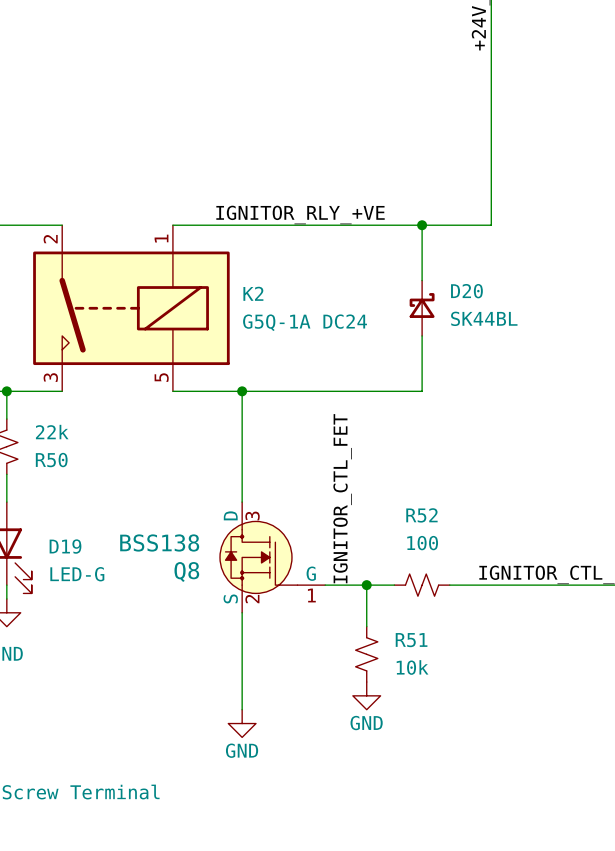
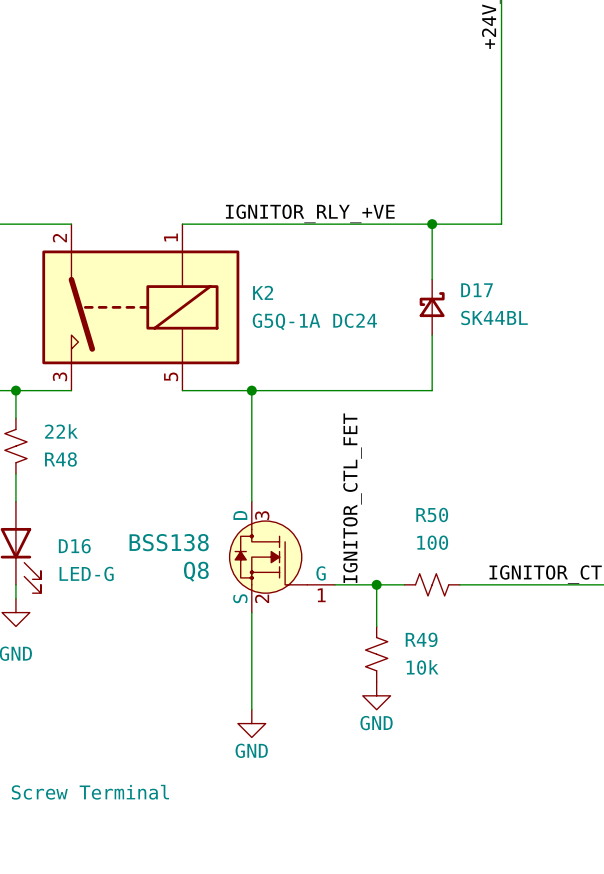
D20 name: D20 (466, 291) -> D17 (477, 290)
R50 name: R50 (51, 460) -> R48 (60, 459)
R52 name: R52 (421, 515) -> R50 (432, 514)
D19 name: D19 (65, 546) -> D16 (74, 546)
R51 name: R51 (411, 640) -> R49 (421, 639)

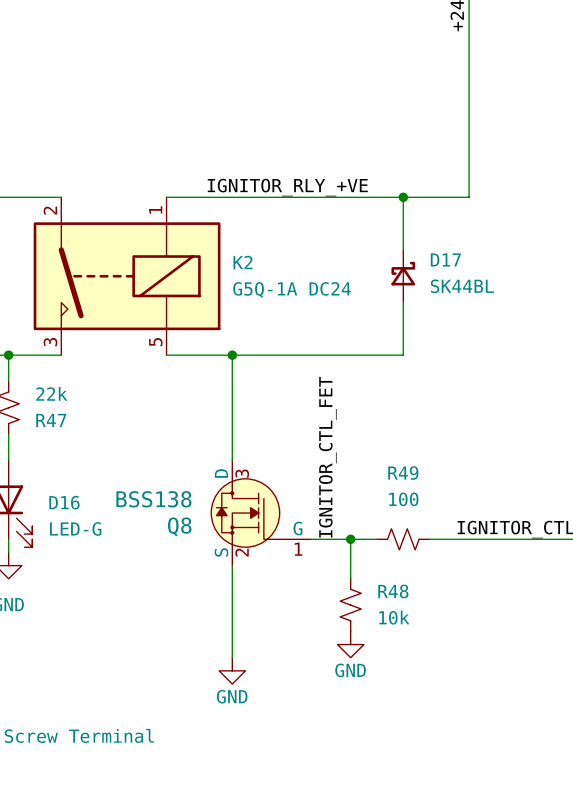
R48 name: R48 (60, 459) -> R47 (51, 420)
R50 name: R50 (432, 514) -> R49 (403, 473)
R49 name: R49 (421, 639) -> R48 (393, 591)

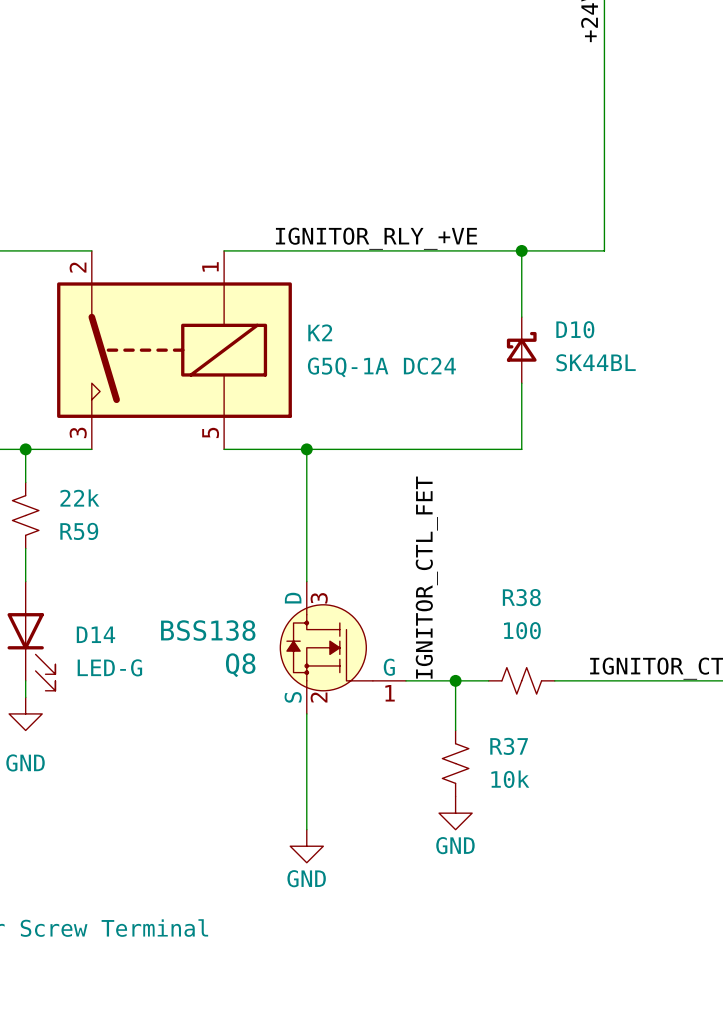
D17 name: D17 (445, 259) -> D10 (575, 329)
R47 name: R47 (51, 420) -> R59 (79, 531)
R49 name: R49 (403, 473) -> R38 (521, 597)
D16 name: D16 (64, 502) -> D14 (95, 634)
R48 name: R48 (393, 591) -> R37 (509, 746)

